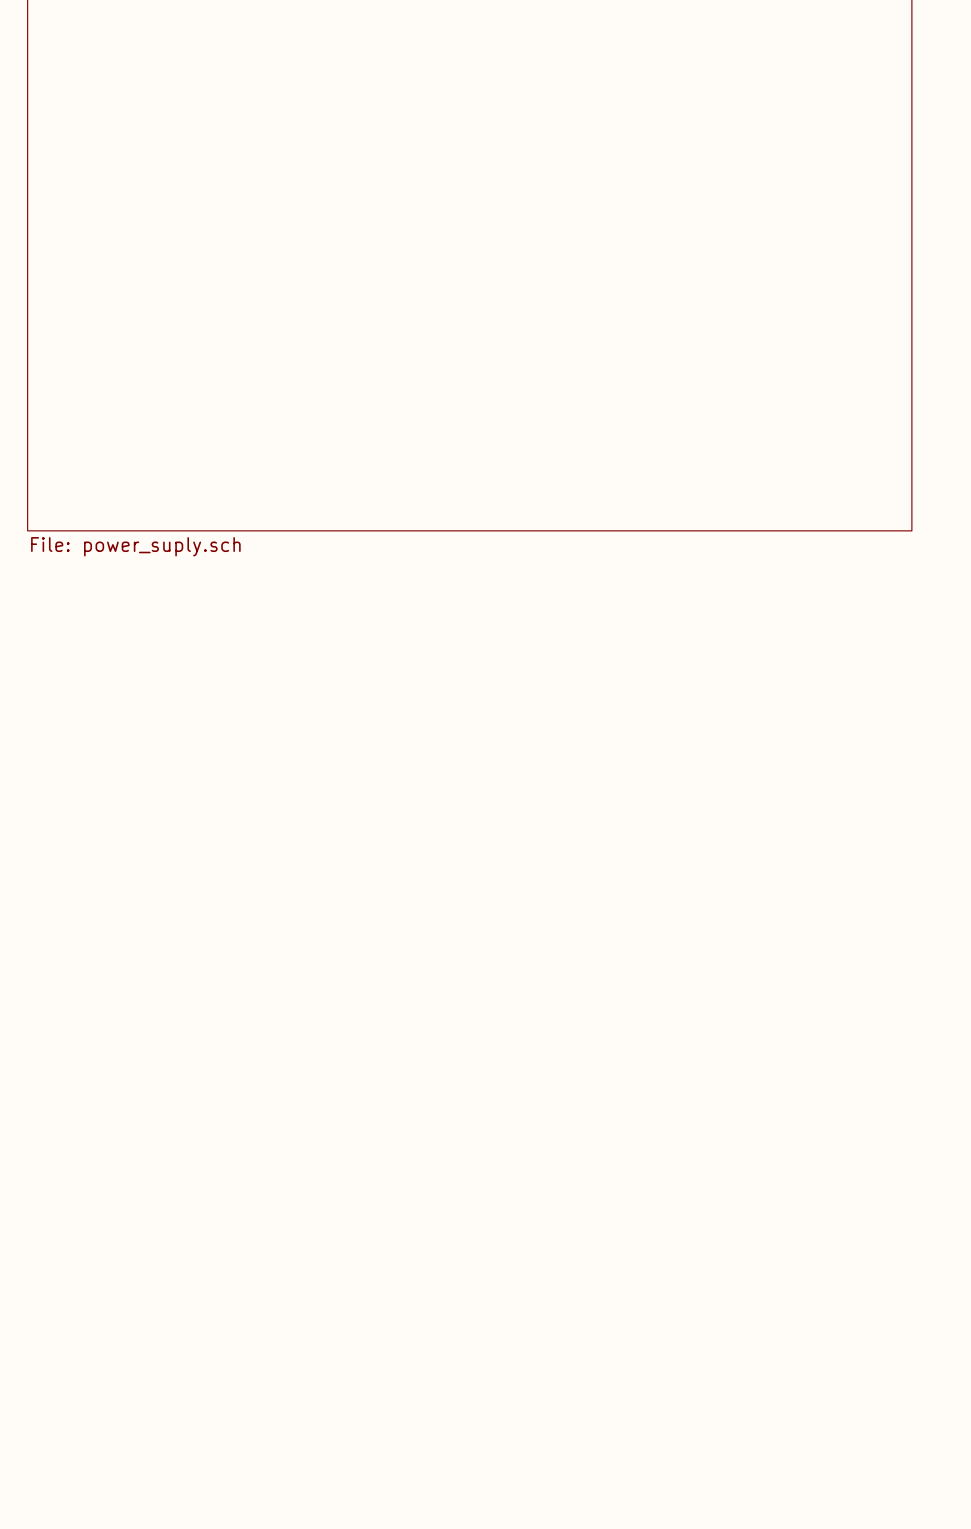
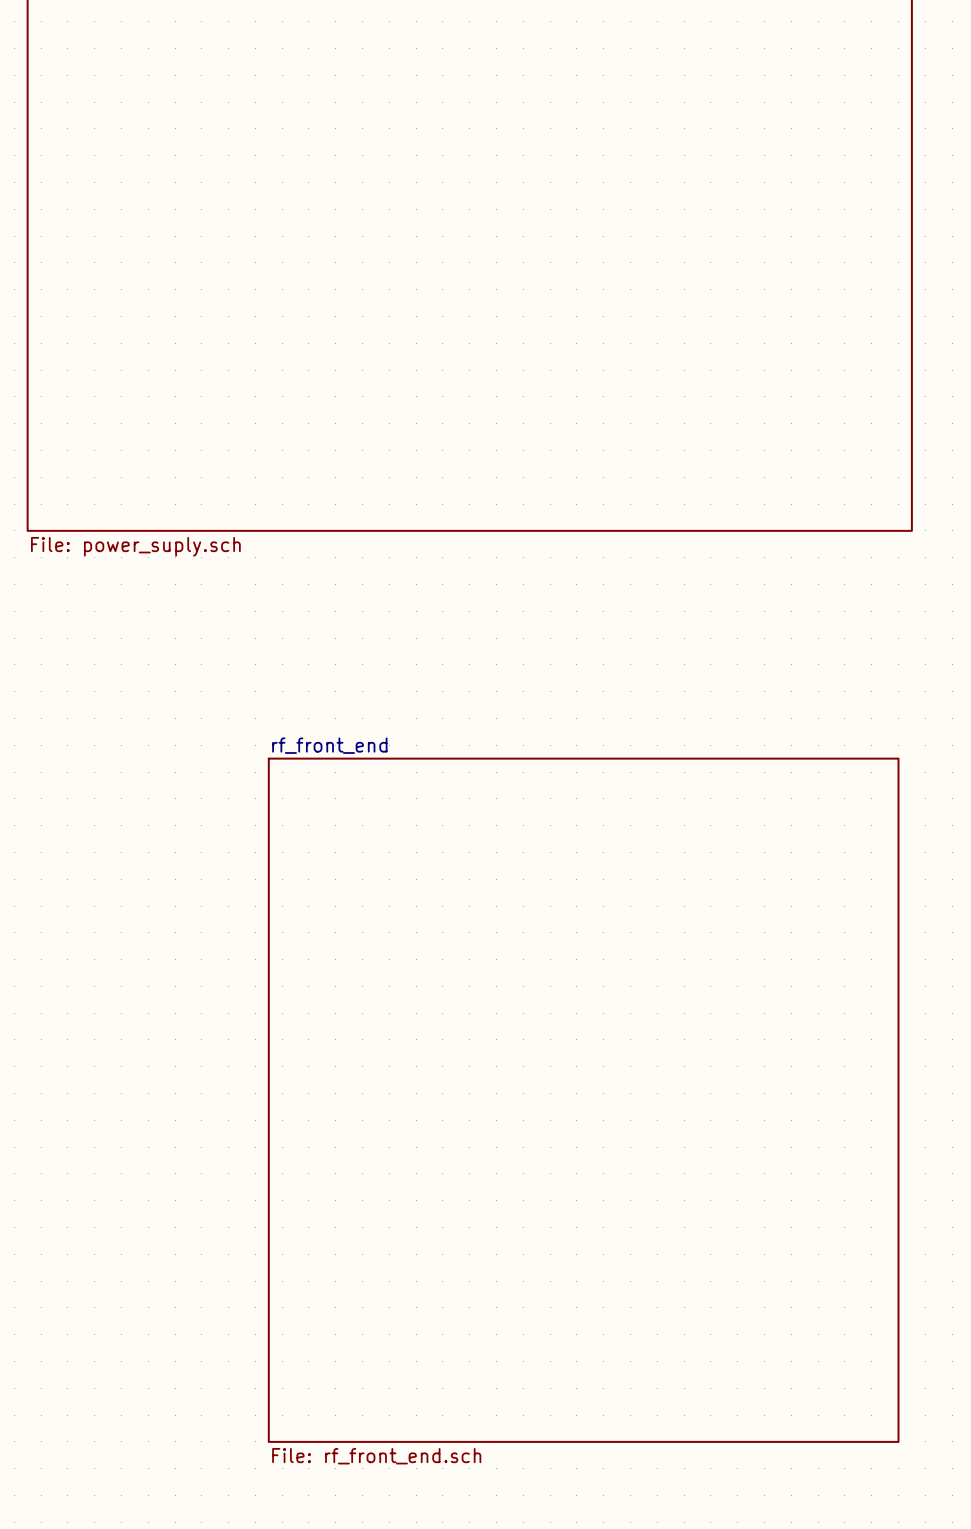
sheet rf_front_end: none -> File: rf_front_end.sch (583, 1100)

